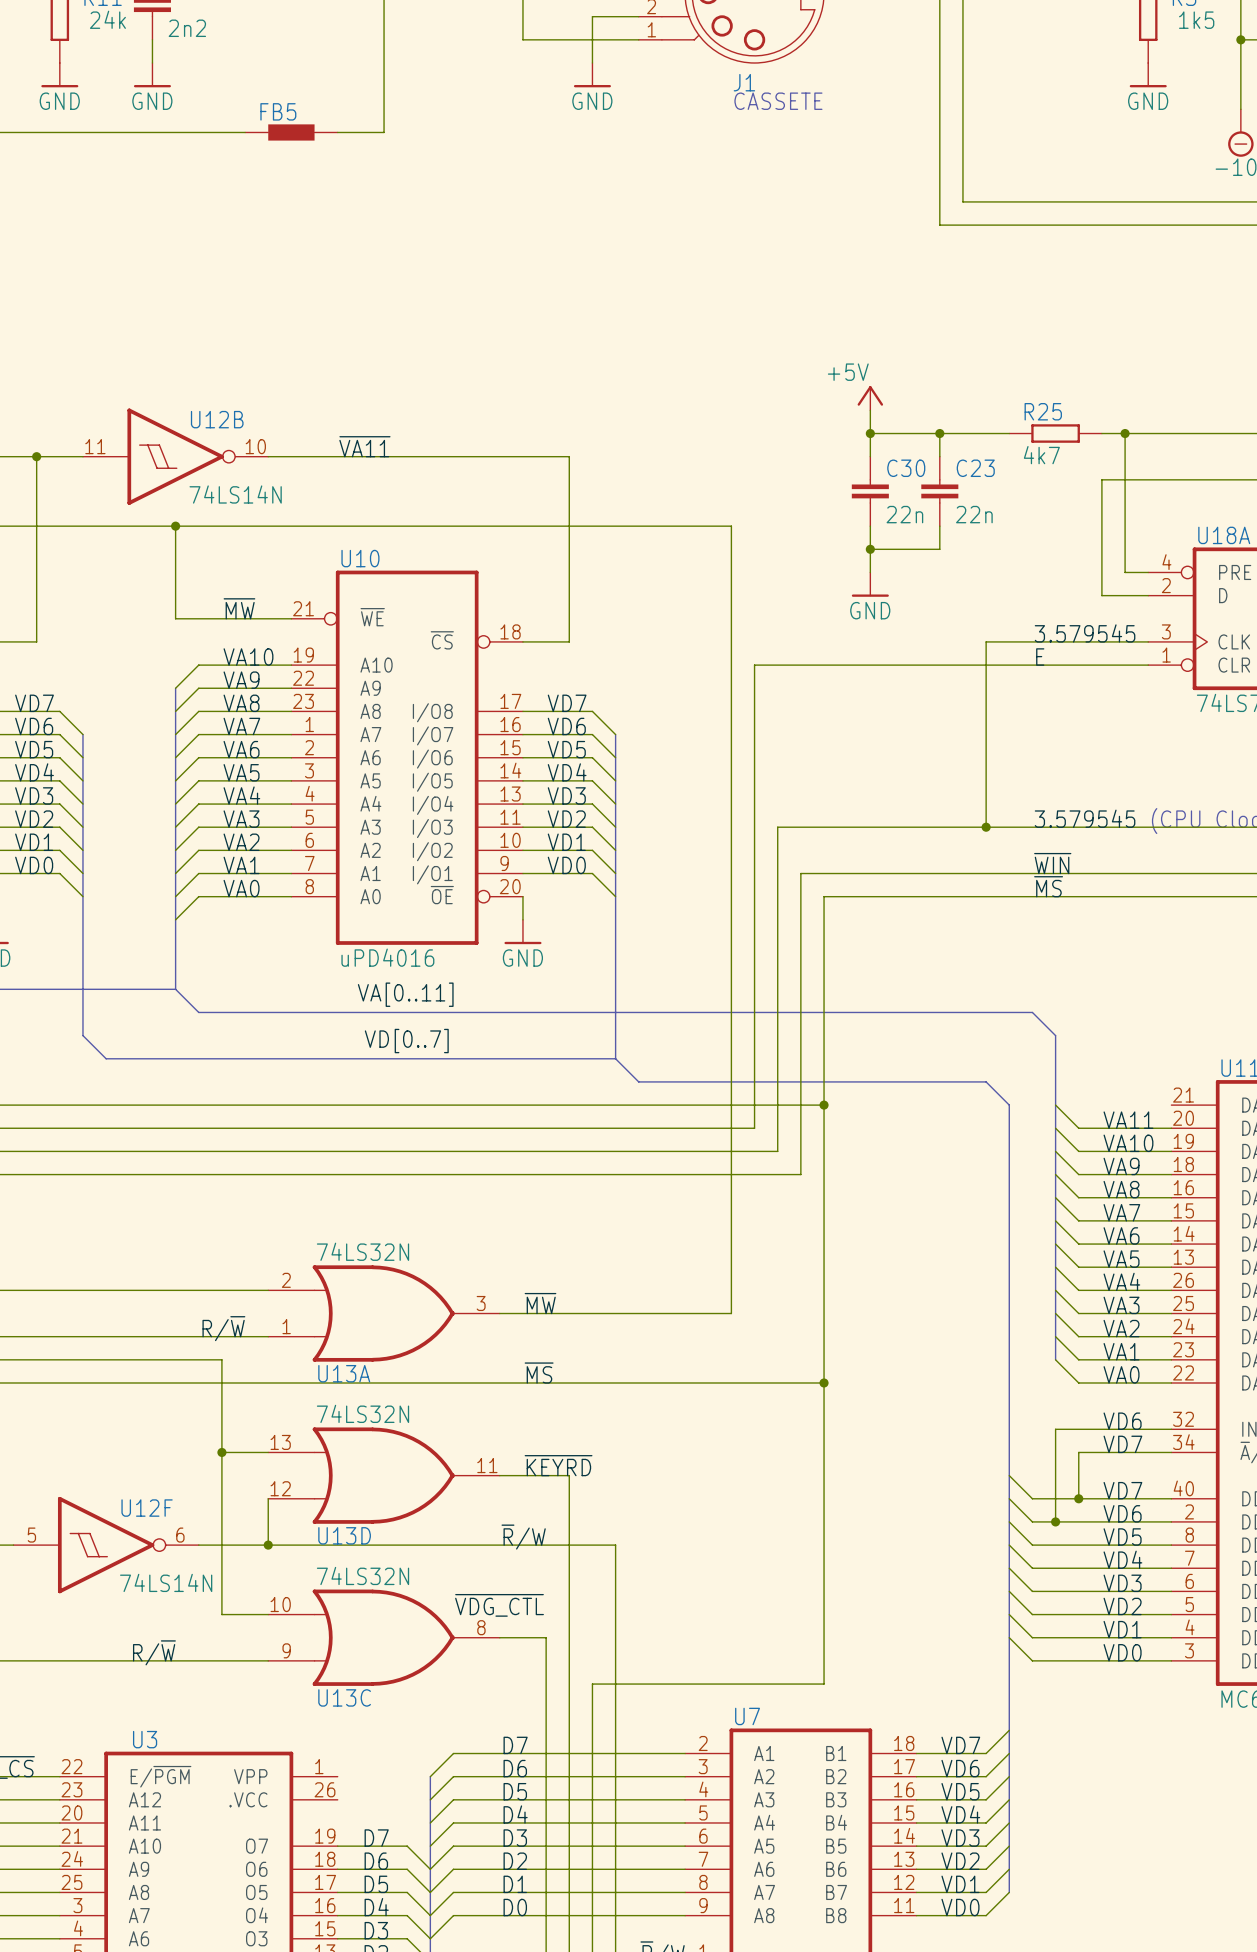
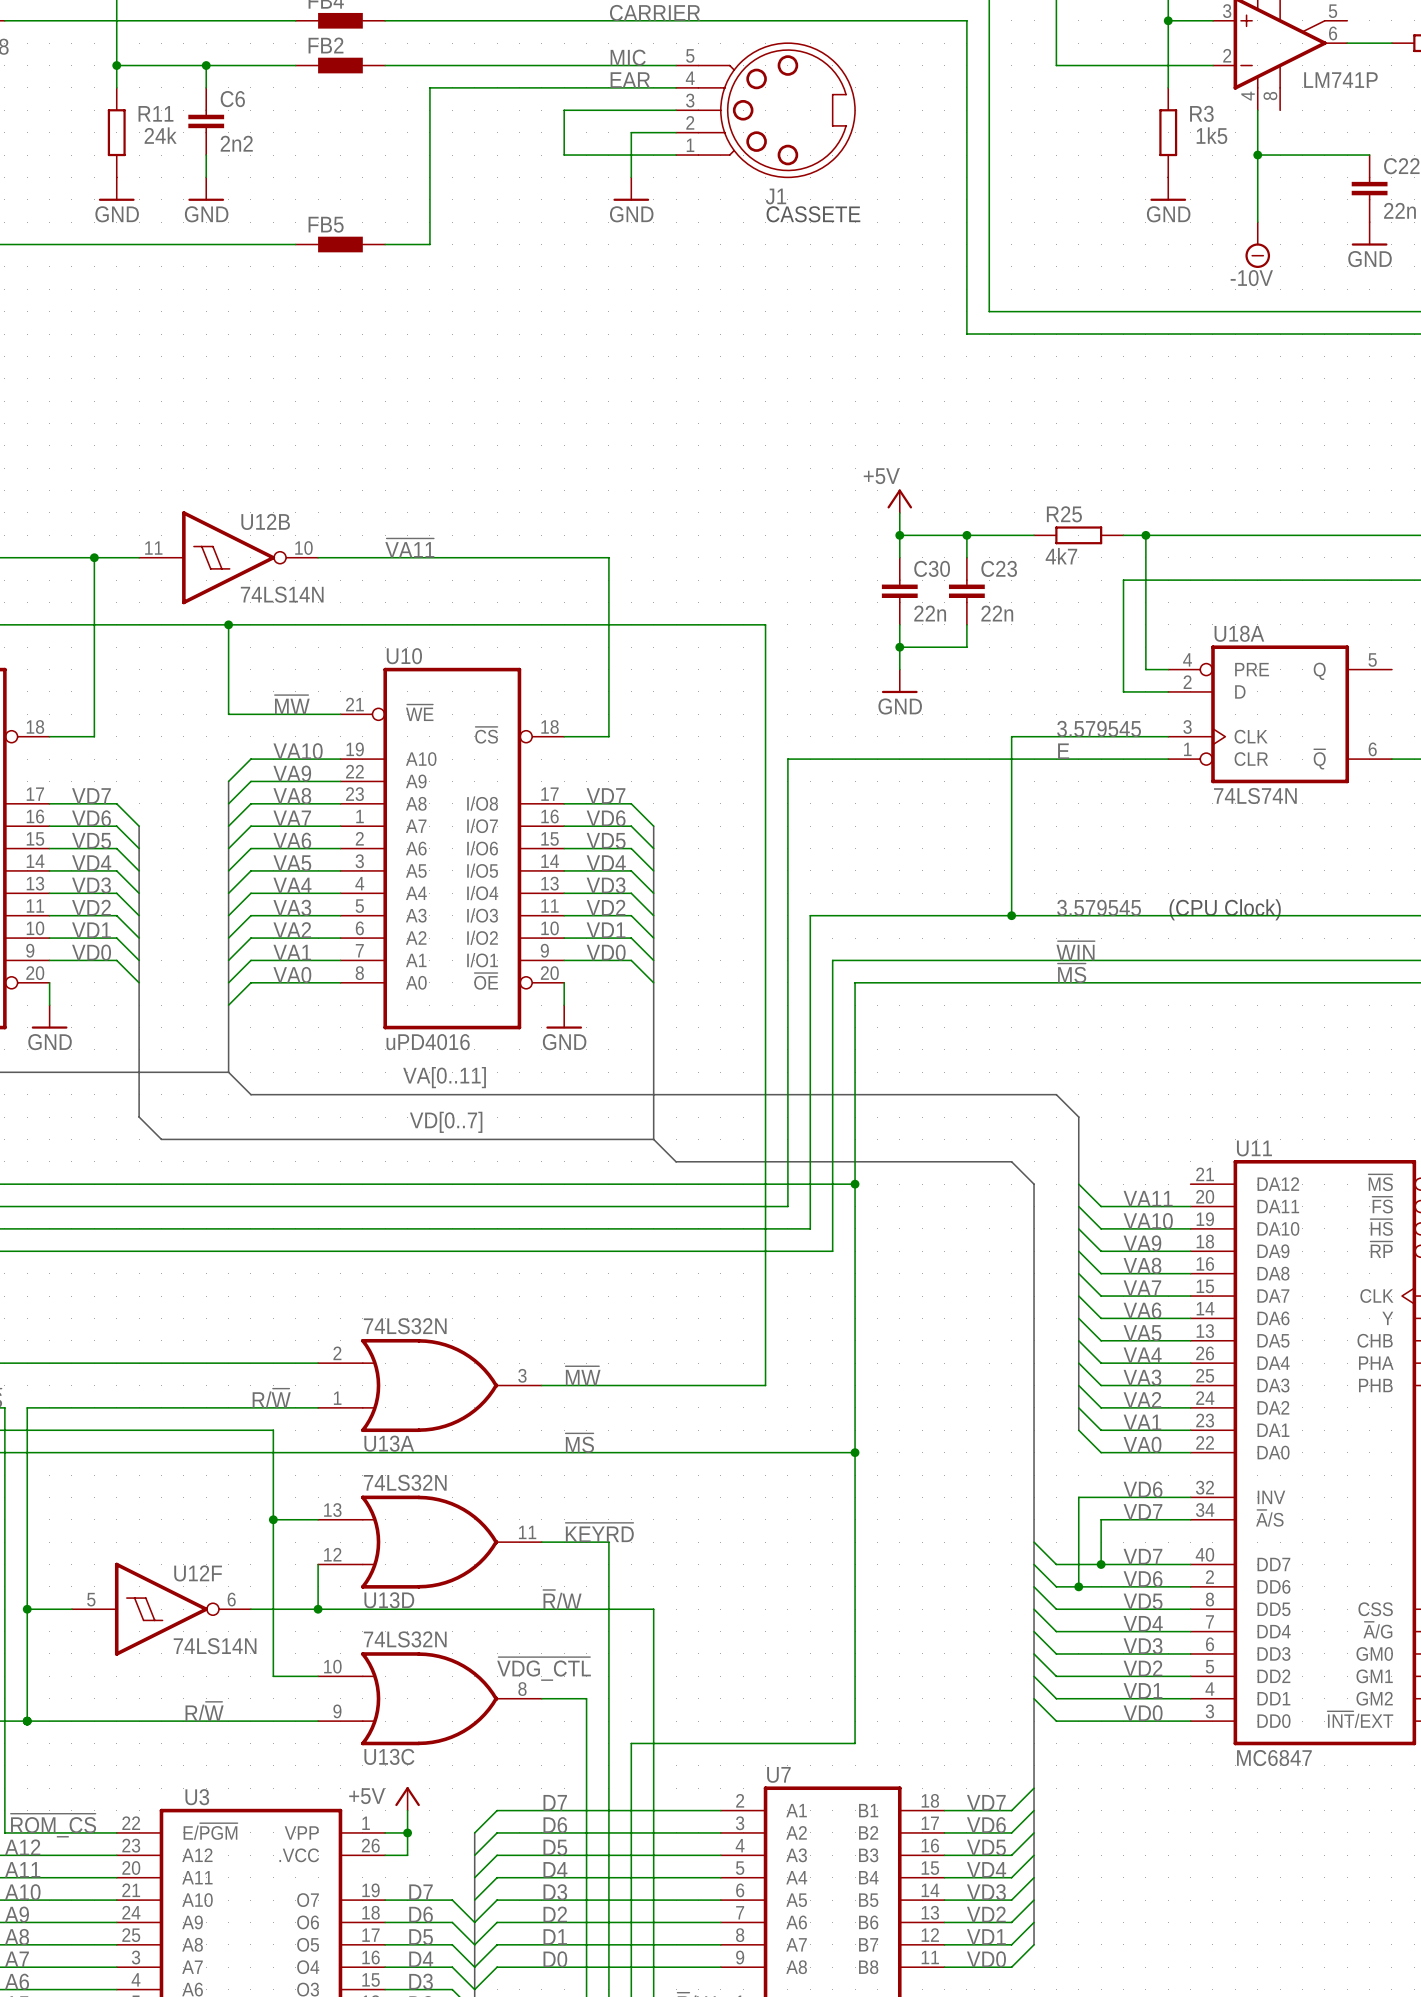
power symbol: none -> +5V (407, 1798)
wire: none -> (407, 1810) (407, 1855) (385, 1855)
wire: none -> (385, 1832) (407, 1832)
junction: none -> (407, 1832)

